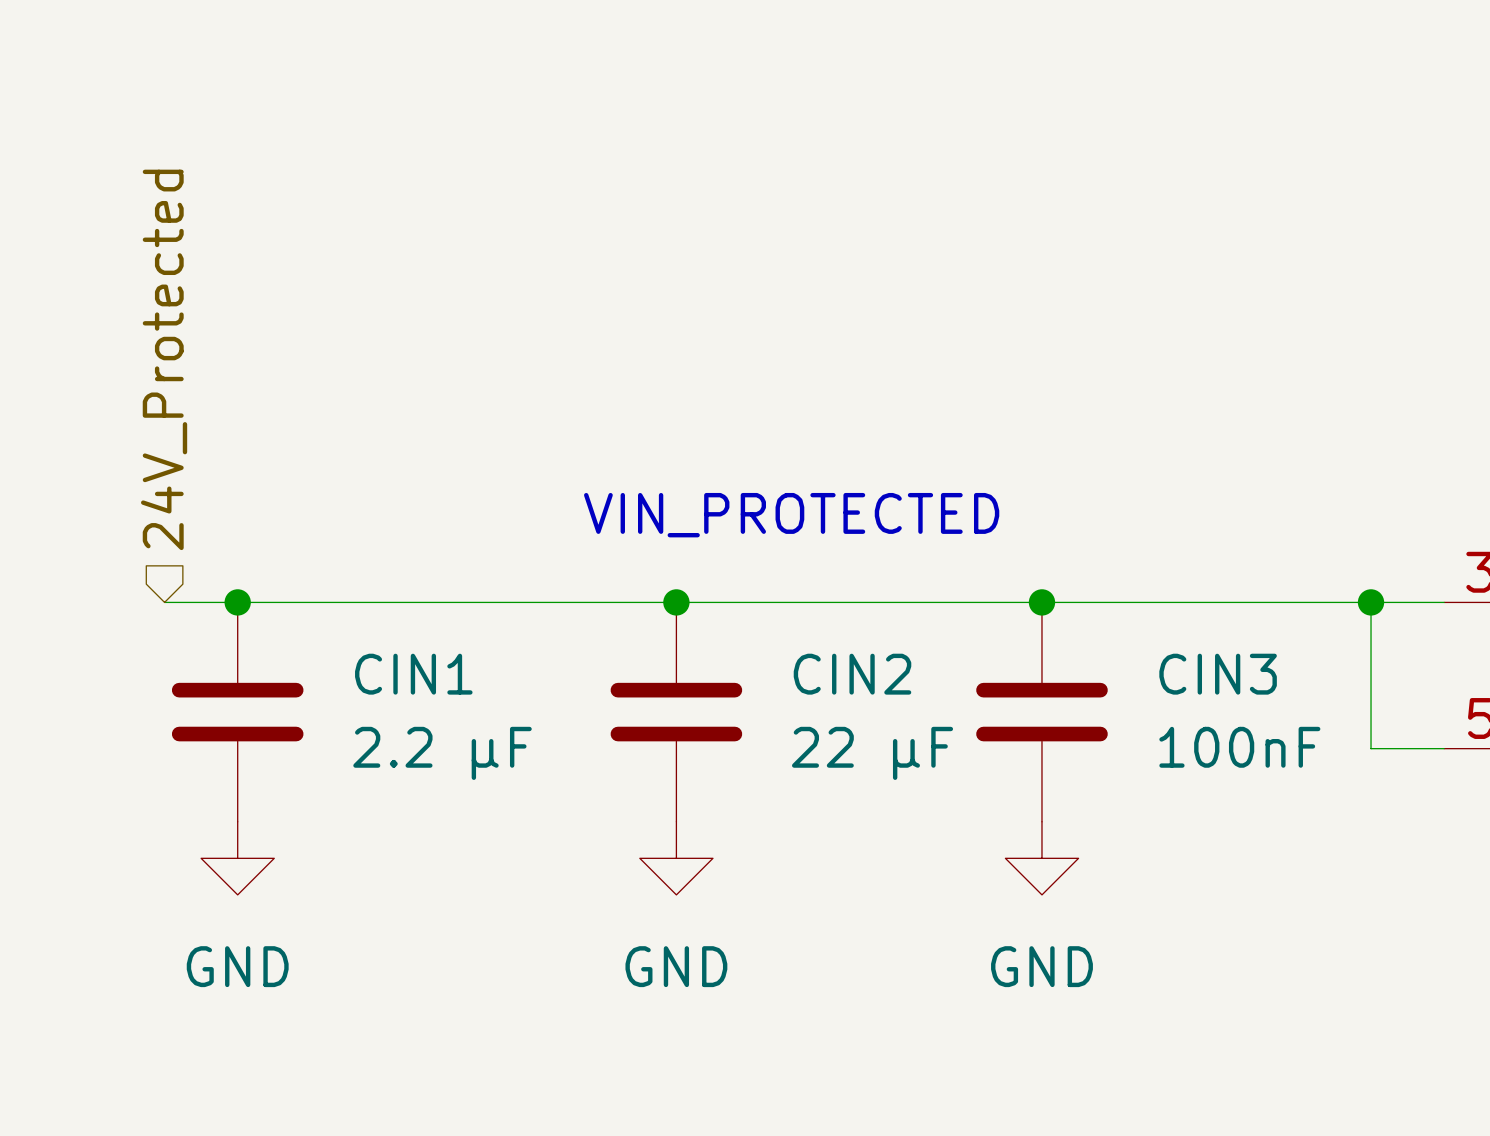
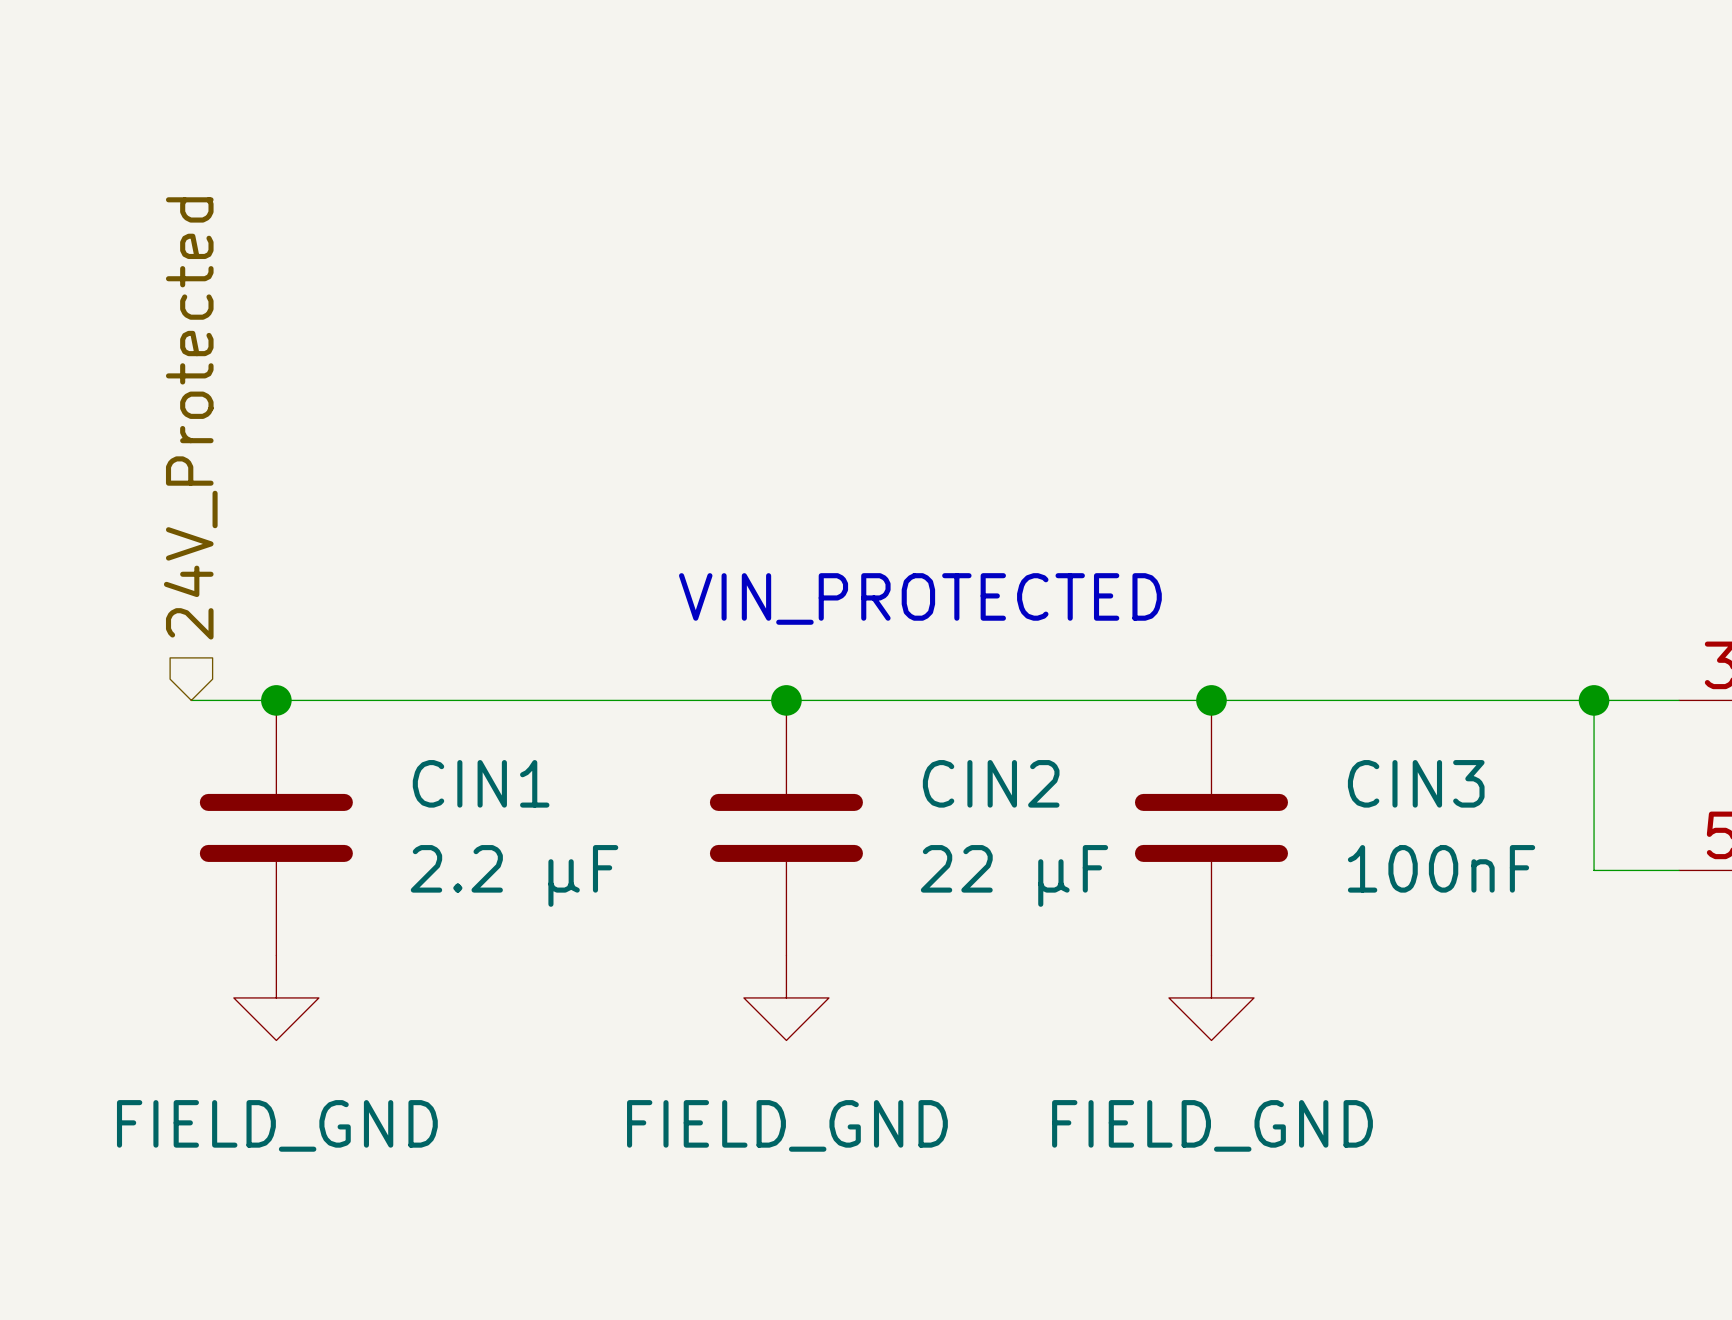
power symbol: GND (237, 858) -> FIELD_GND (276, 997)
power symbol: GND (676, 858) -> FIELD_GND (786, 997)
power symbol: GND (1041, 858) -> FIELD_GND (1211, 997)

